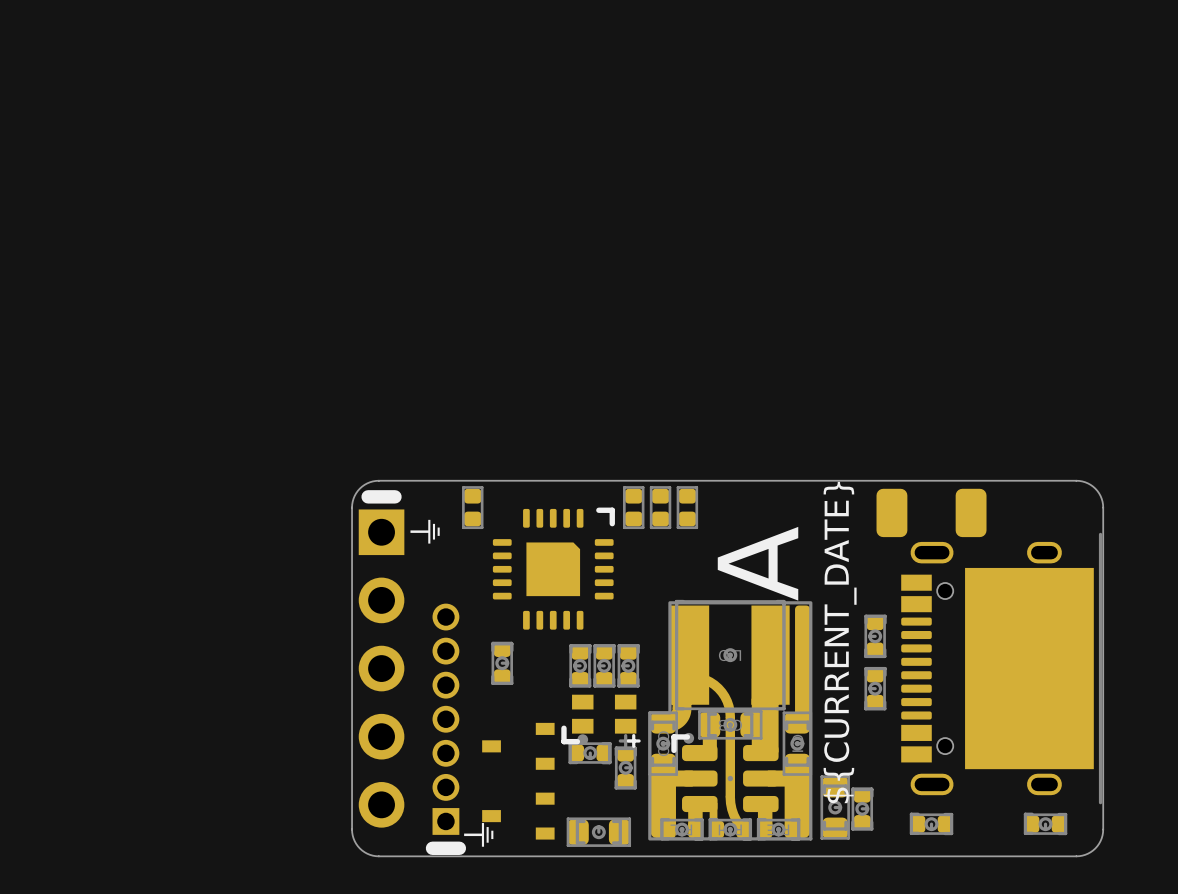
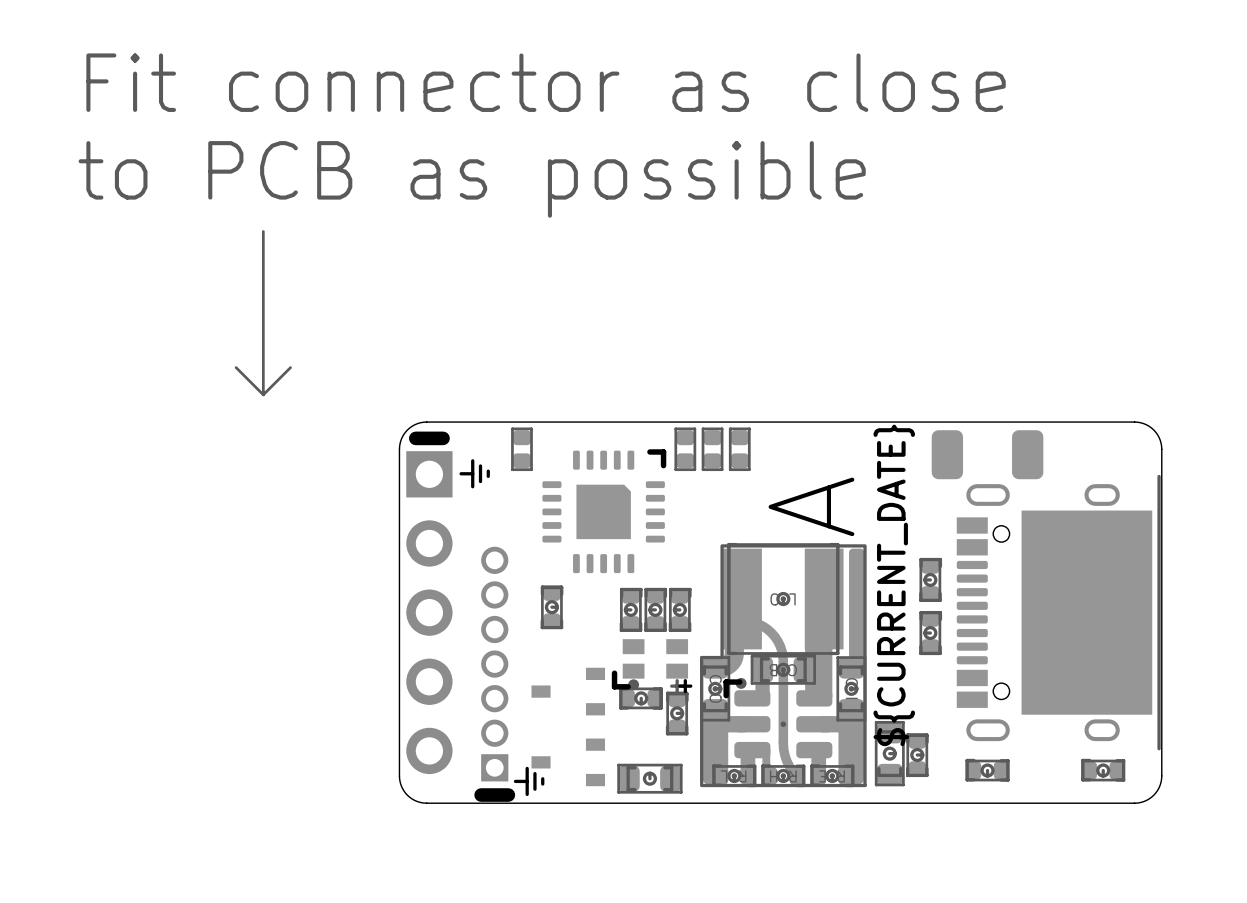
text: none -> Fit connector as close (546, 82)
text: none -> to PCB as possible (472, 179)
line: none -> (263, 231) (263, 394)
line: none -> (236, 367) (263, 394)
line: none -> (290, 367) (263, 394)

